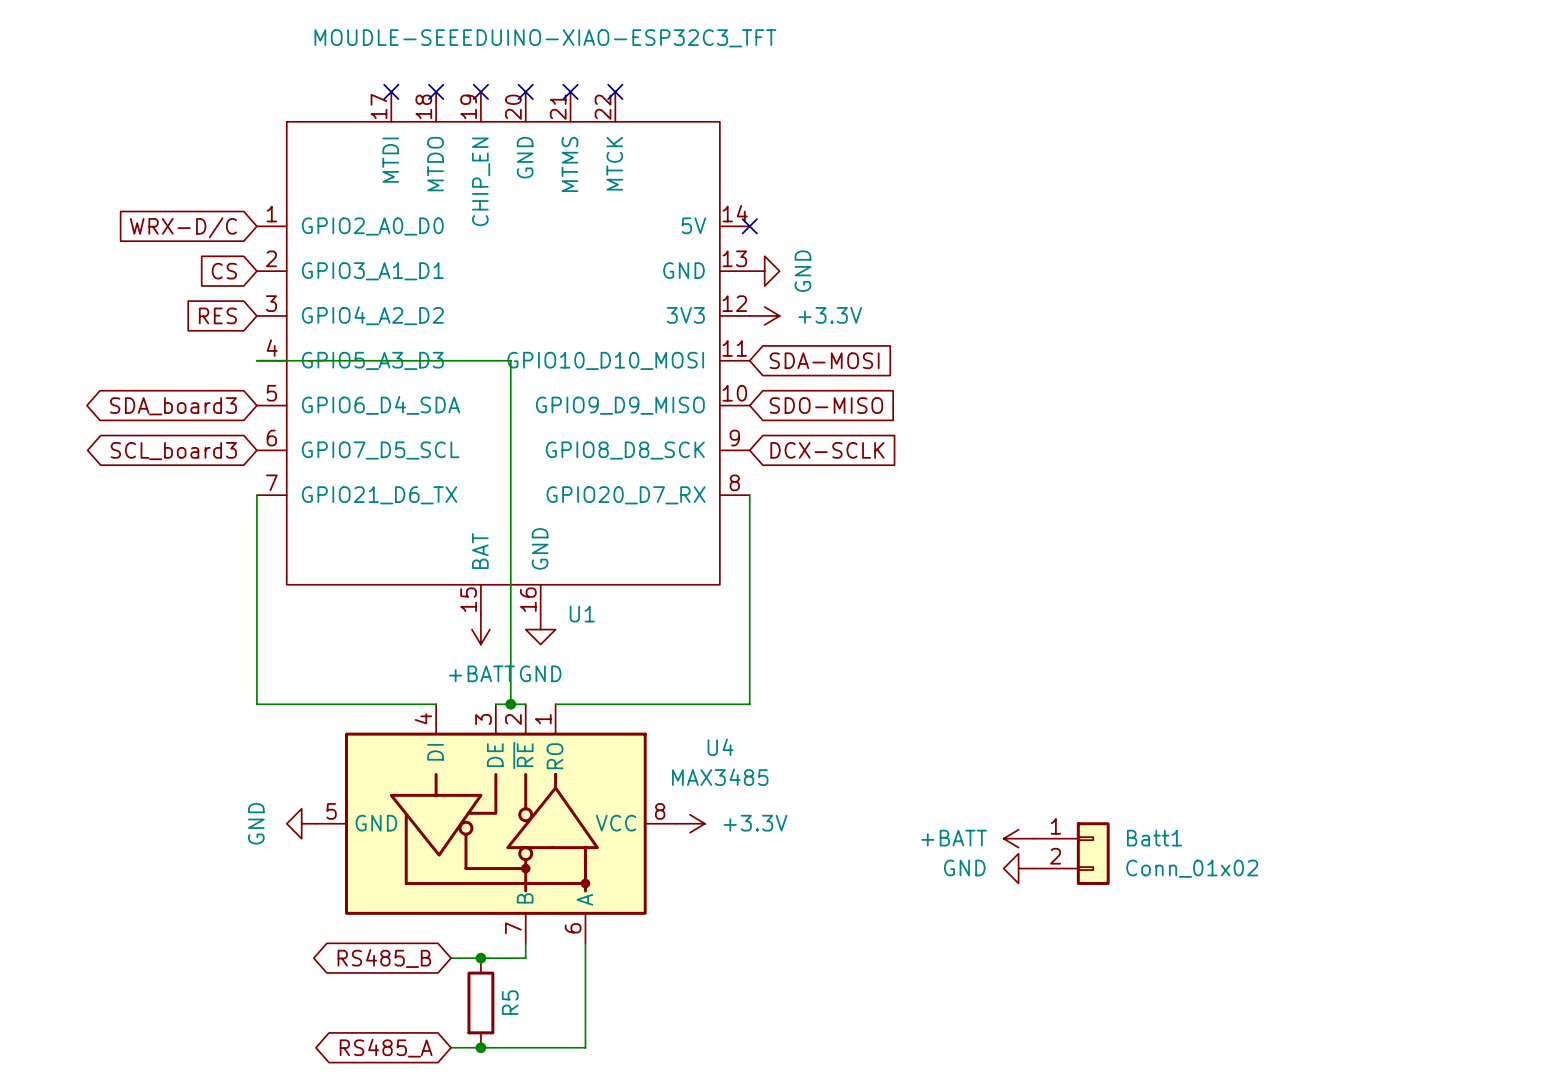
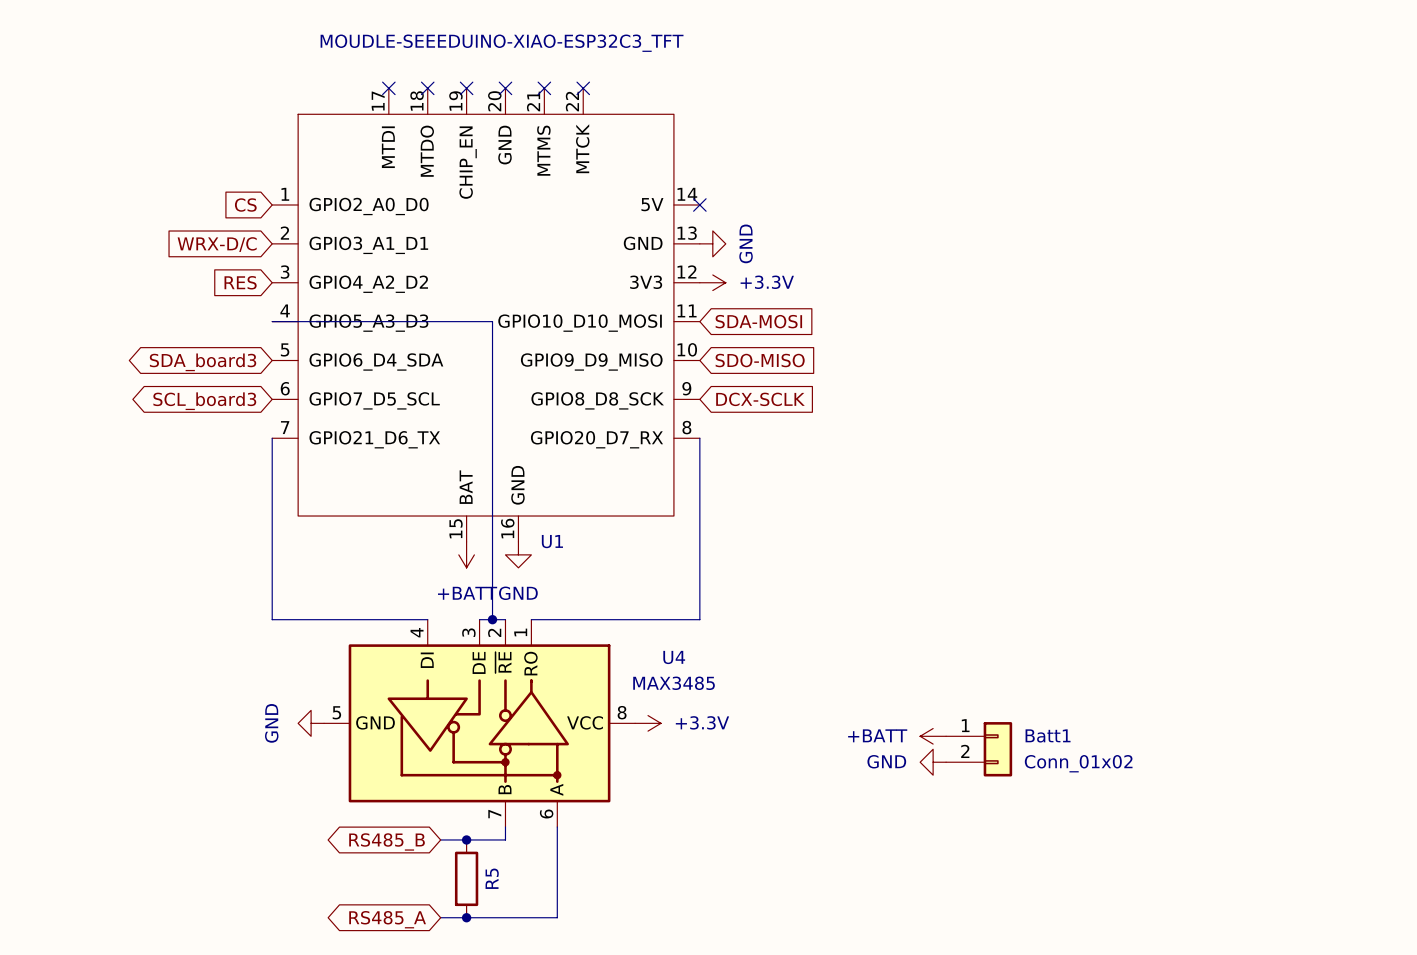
global label: WRX-D/C (183, 227) -> CS (245, 205)
global label: CS (224, 271) -> WRX-D/C (217, 244)

